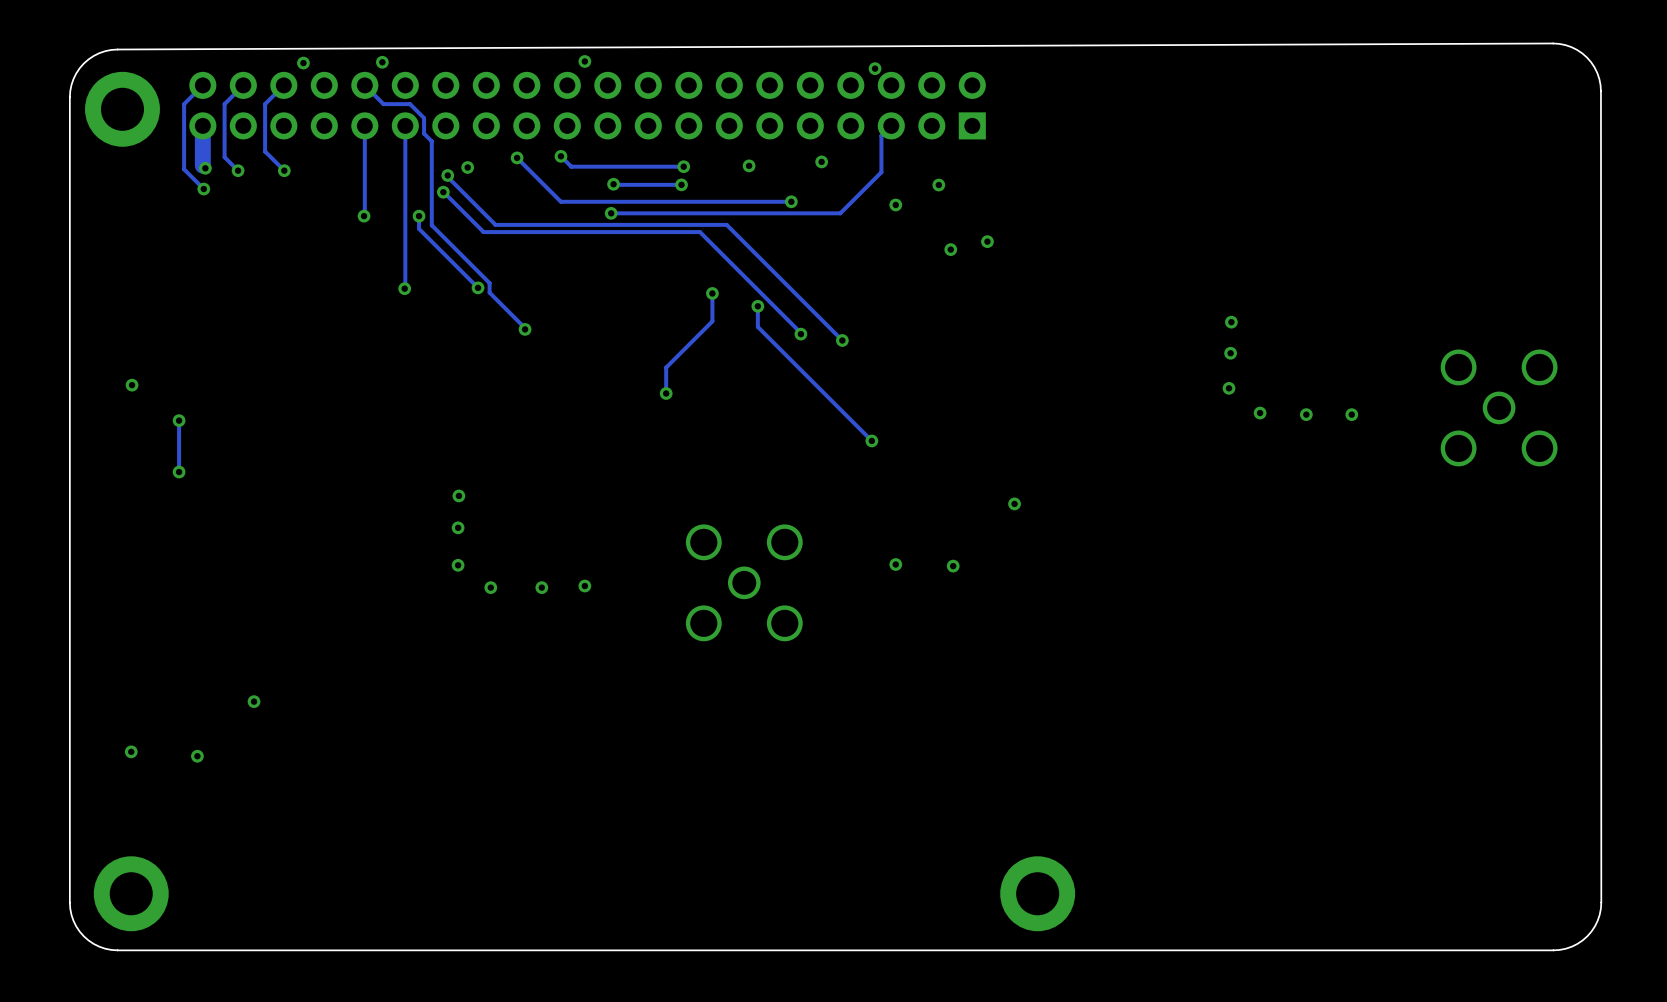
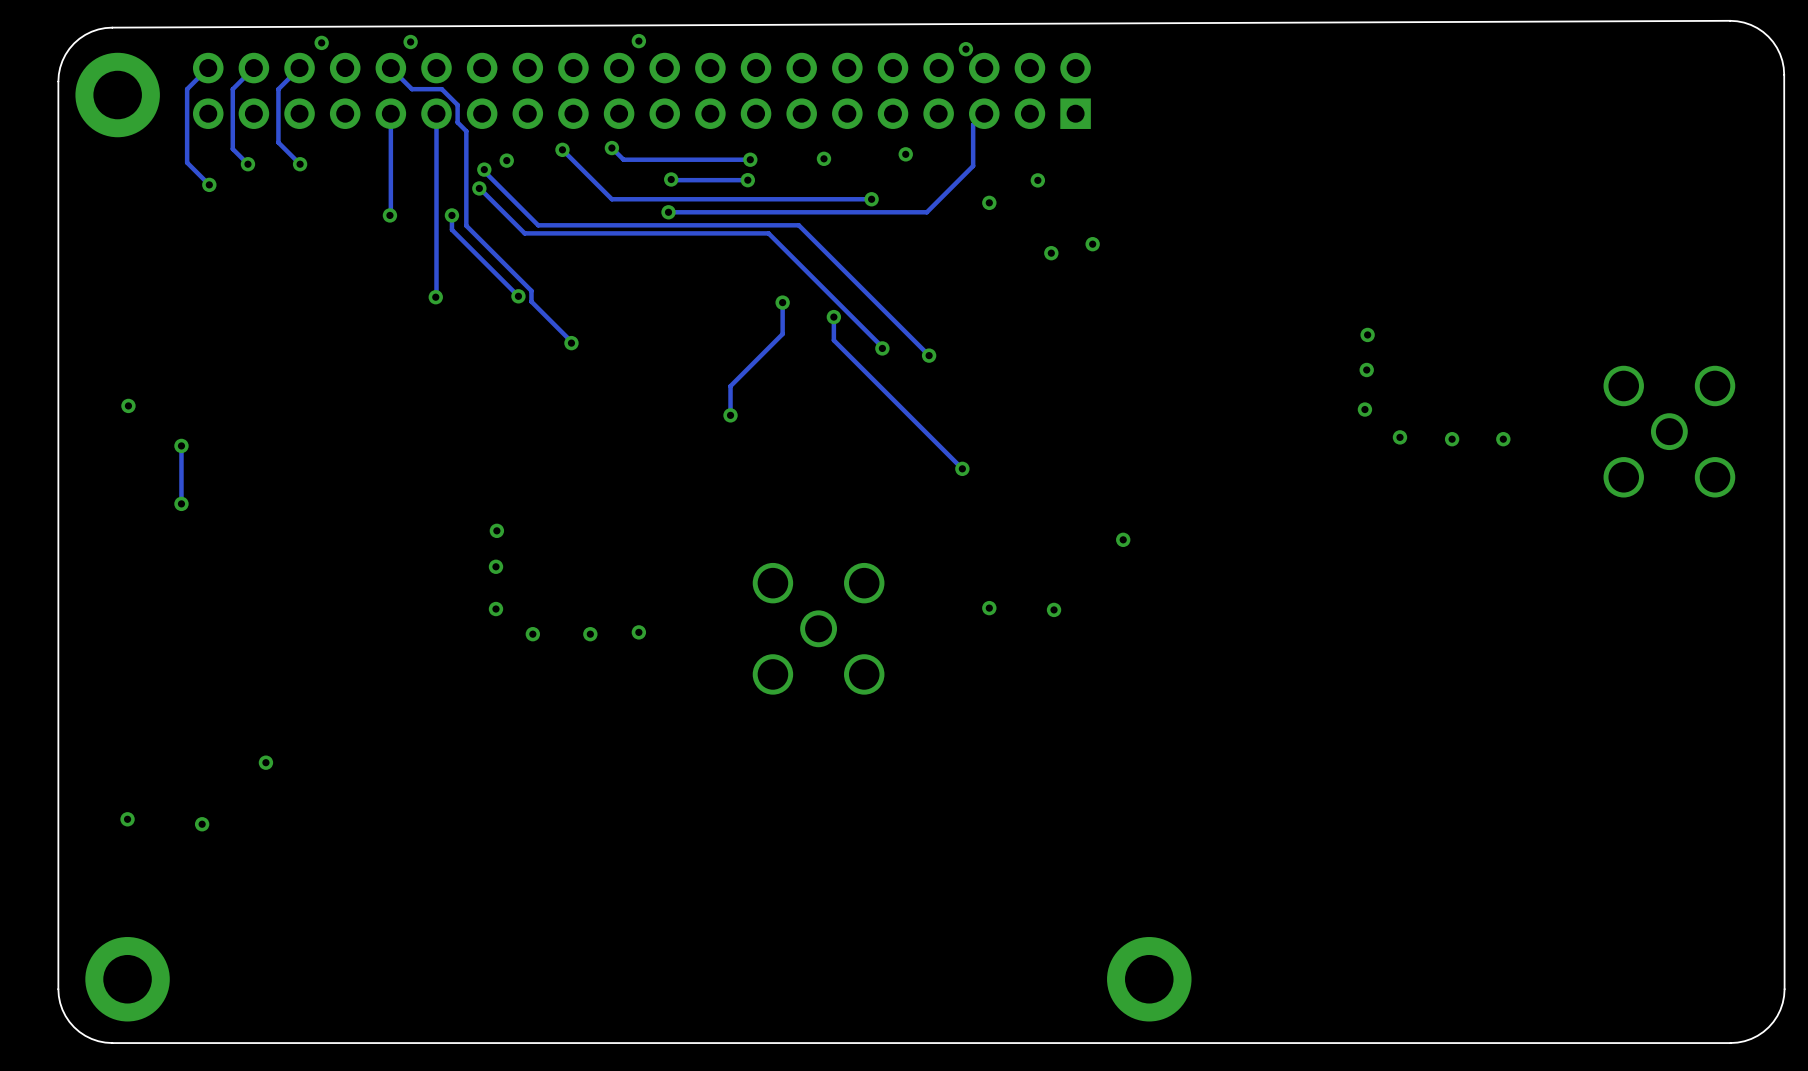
track: (202, 125) (202, 165) (205, 168) -> none
via: (205, 168) -> none

